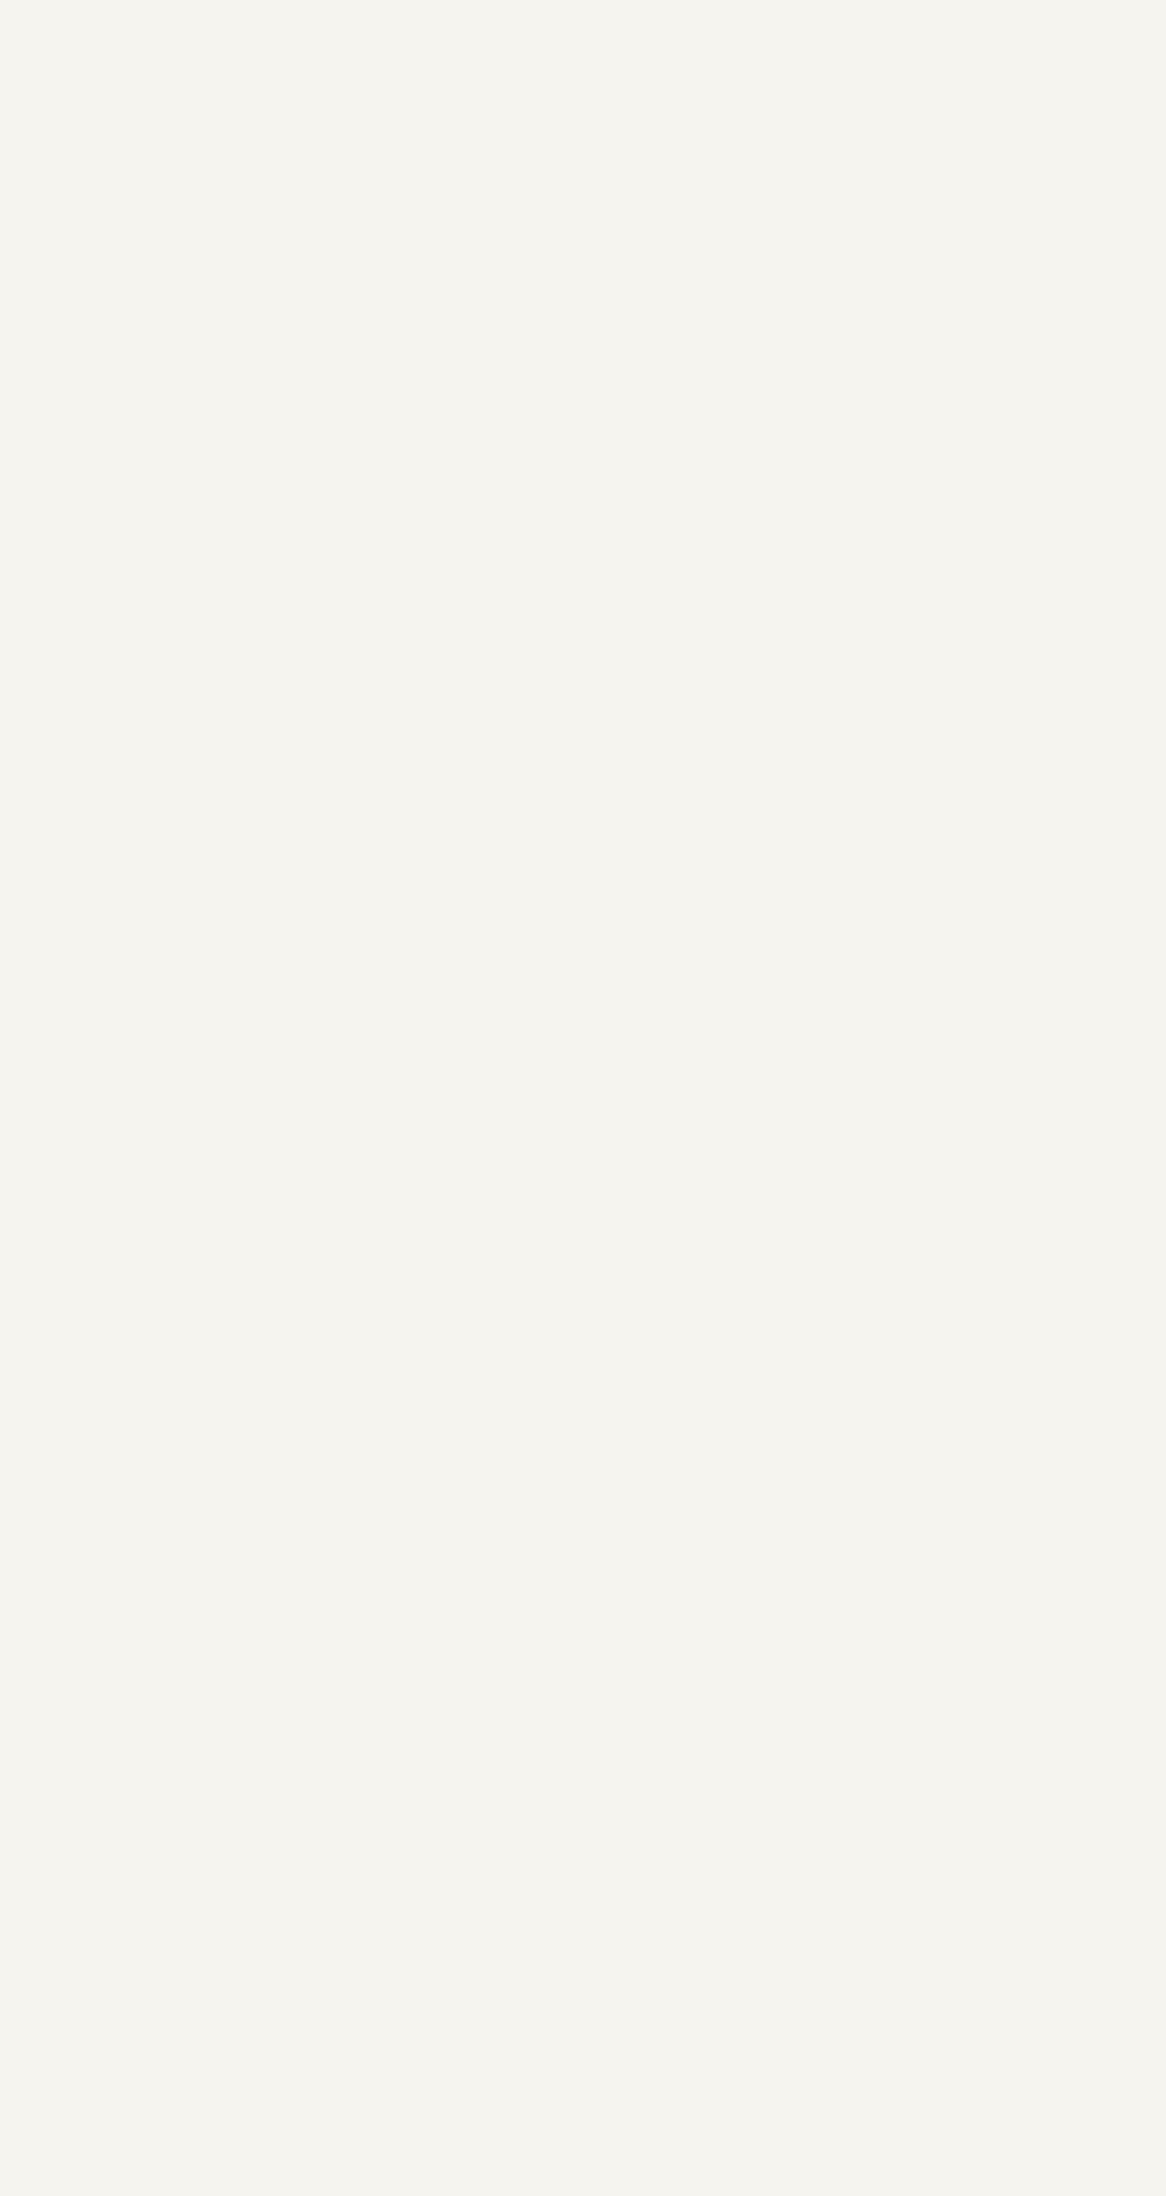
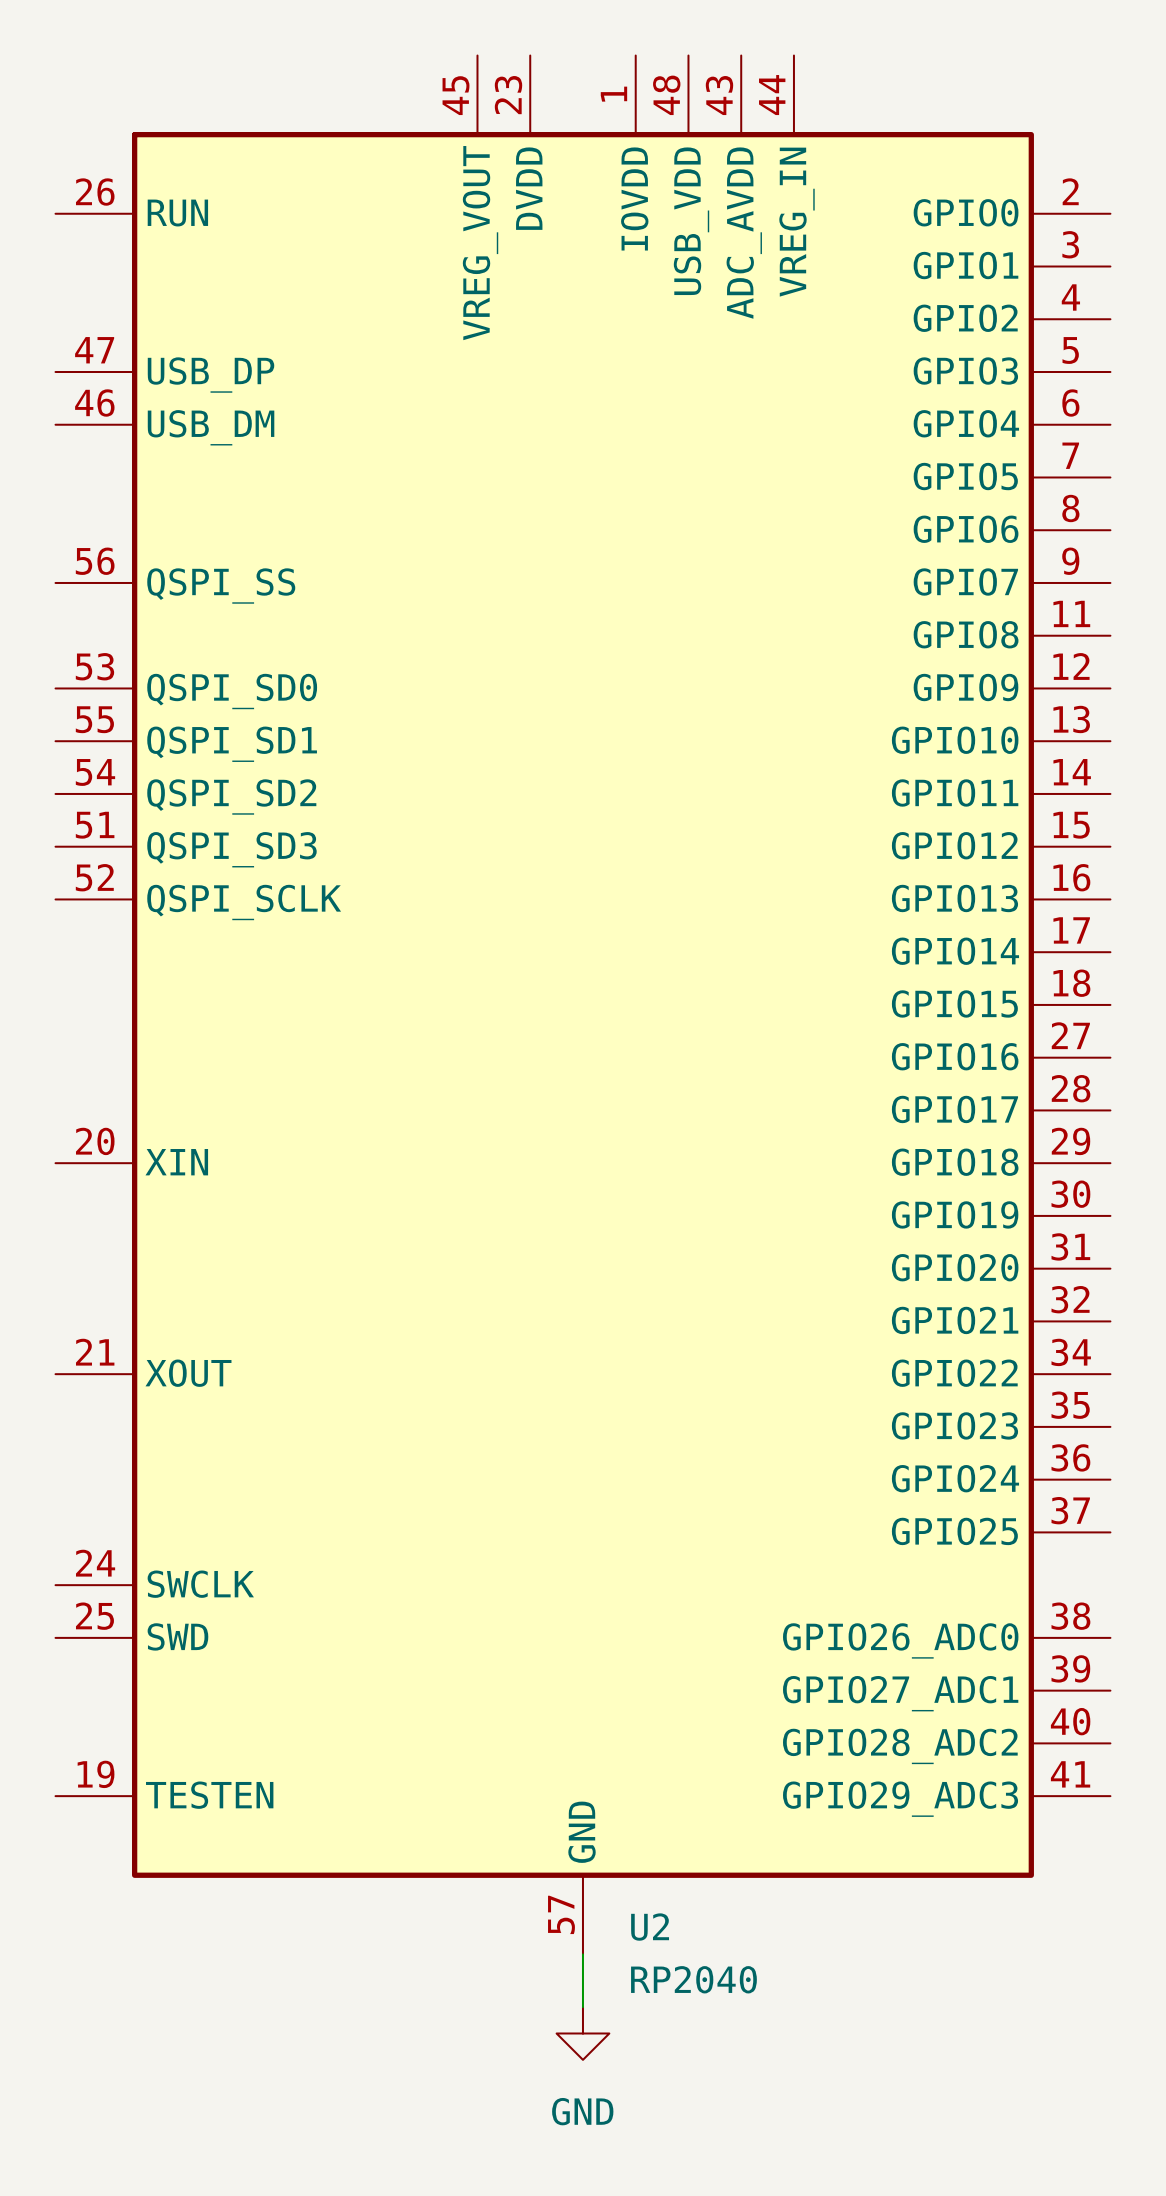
U2: none -> RP2040 (582, 1004)
wire: none -> (582, 1954) (582, 2007)
power symbol: none -> GND (582, 2033)

